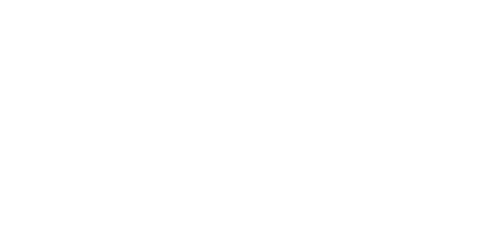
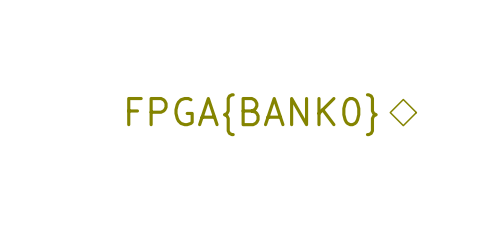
hierarchical label: none -> FPGA{BANK0} (252, 114)

